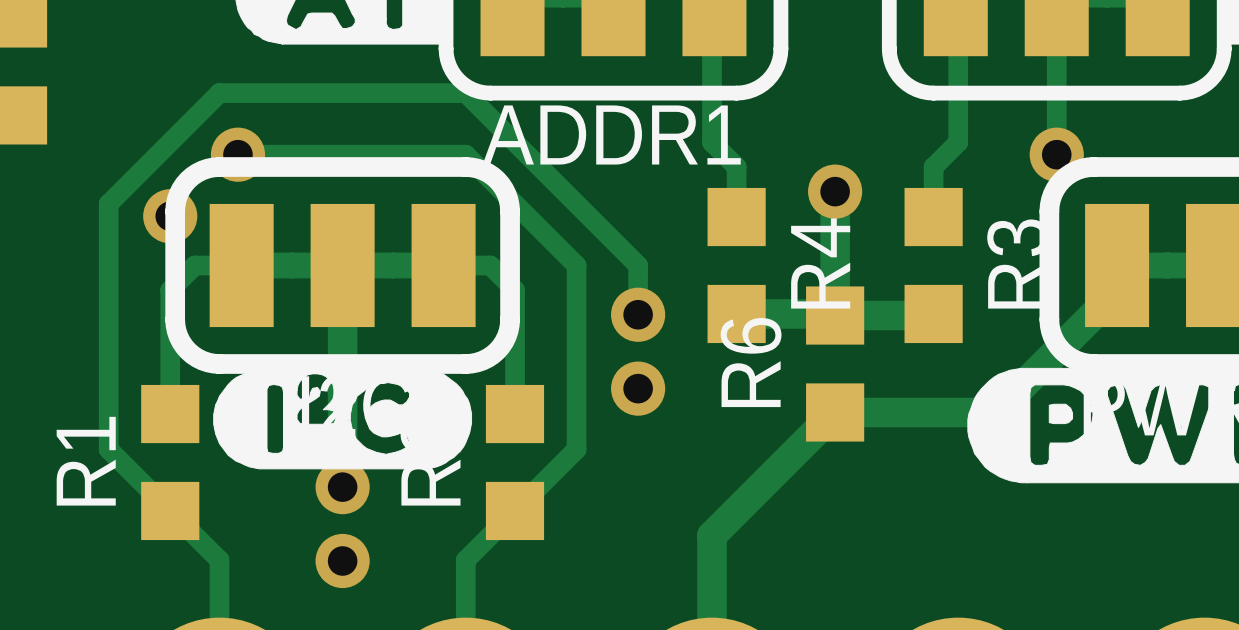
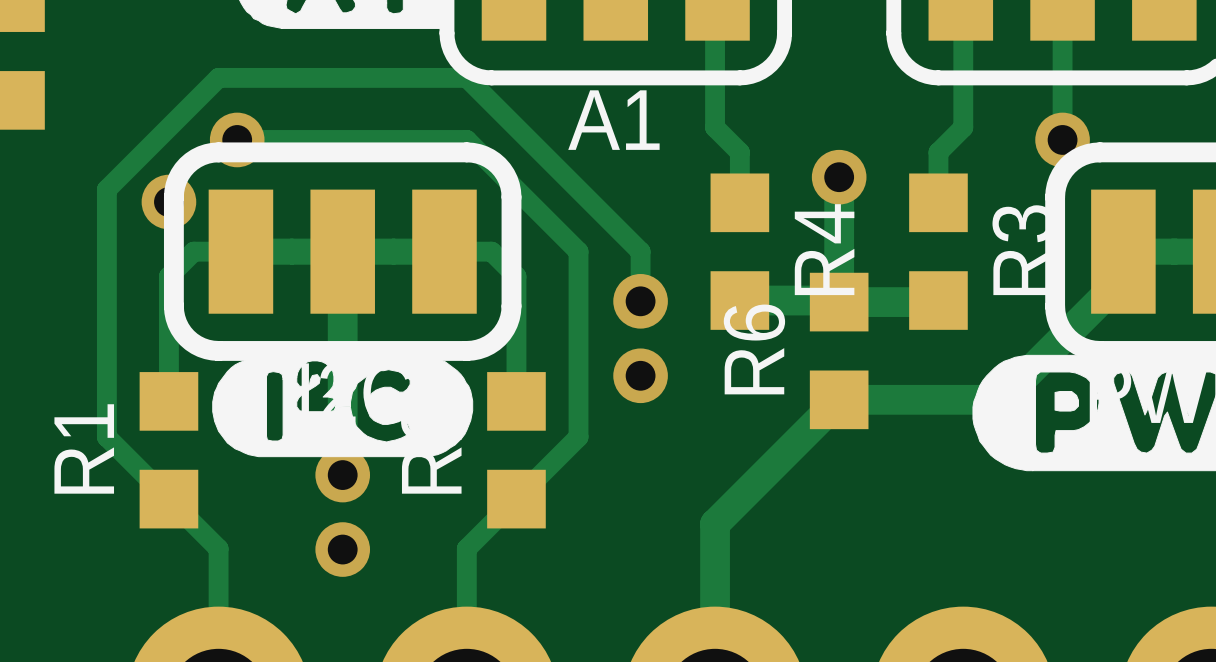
ADDR1 name: ADDR1 (611, 134) -> A1 (613, 120)

